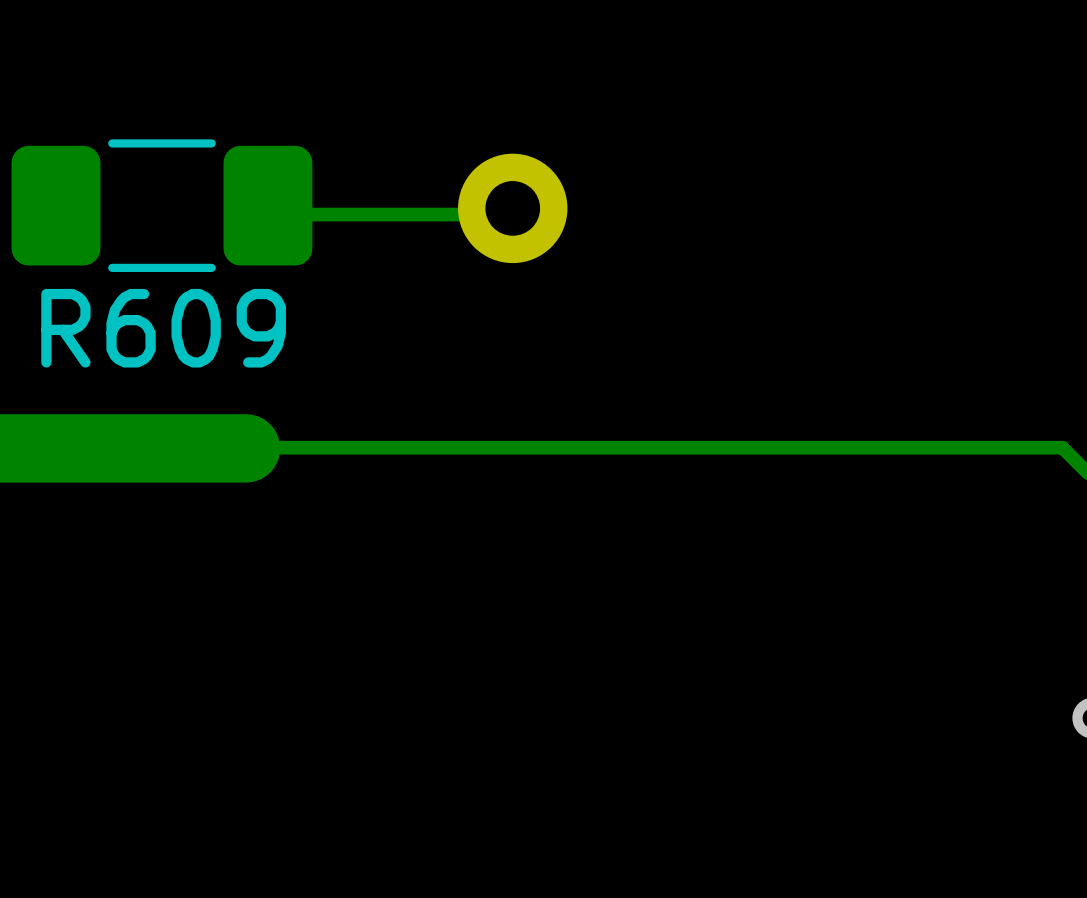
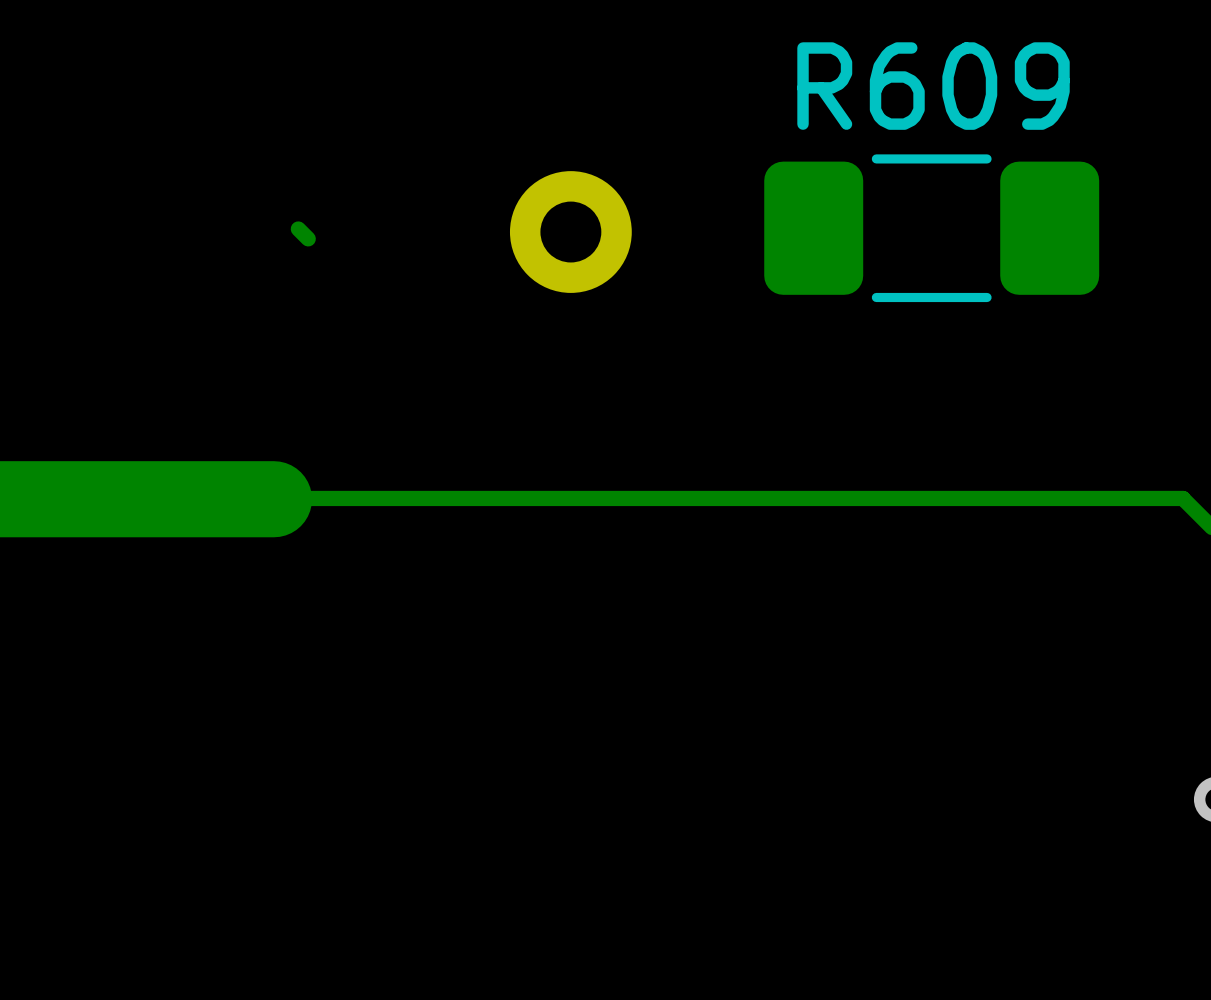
R609 position: (161, 205) -> (931, 228)
track: (506, 214) (276, 214) -> none
R609 name position: R609 (163, 328) -> R609 (933, 86)

